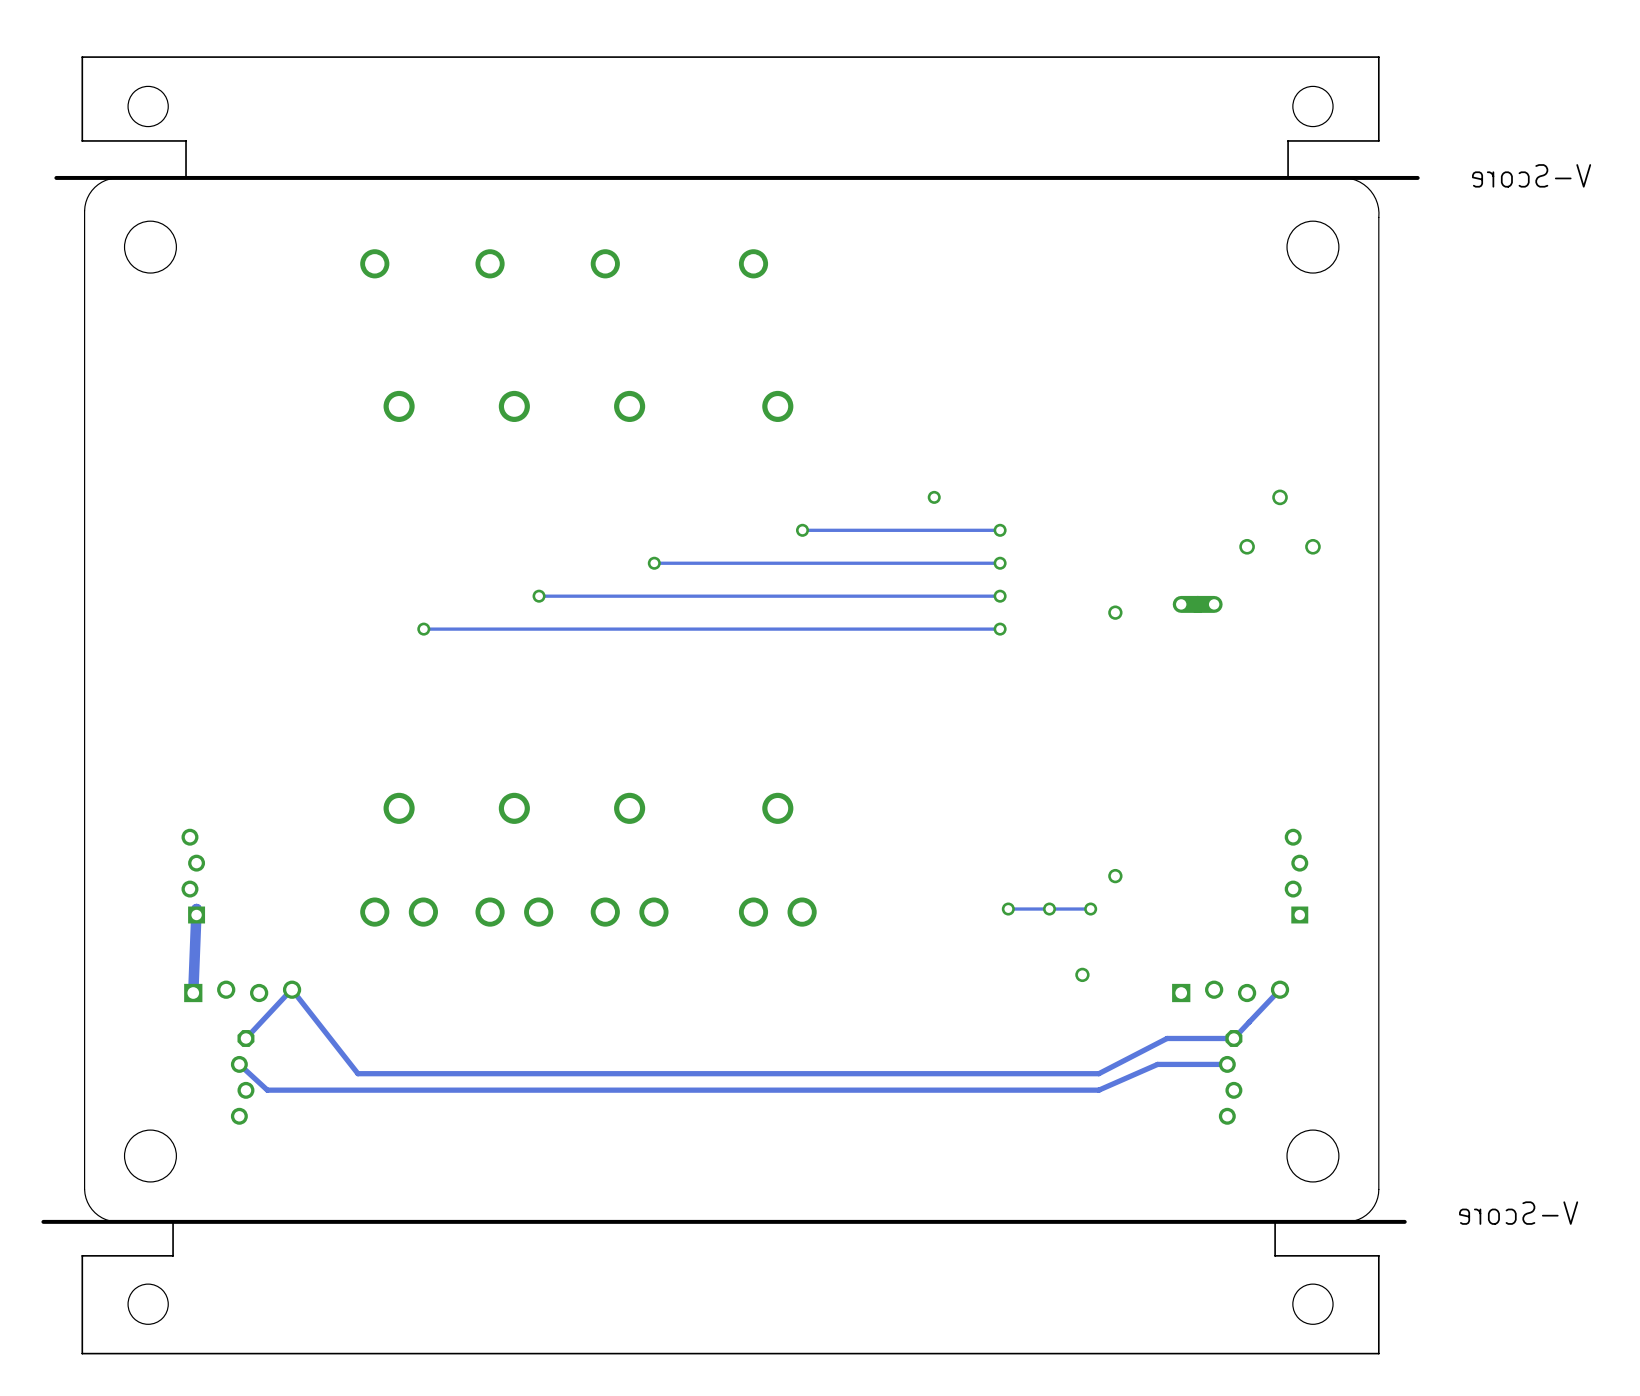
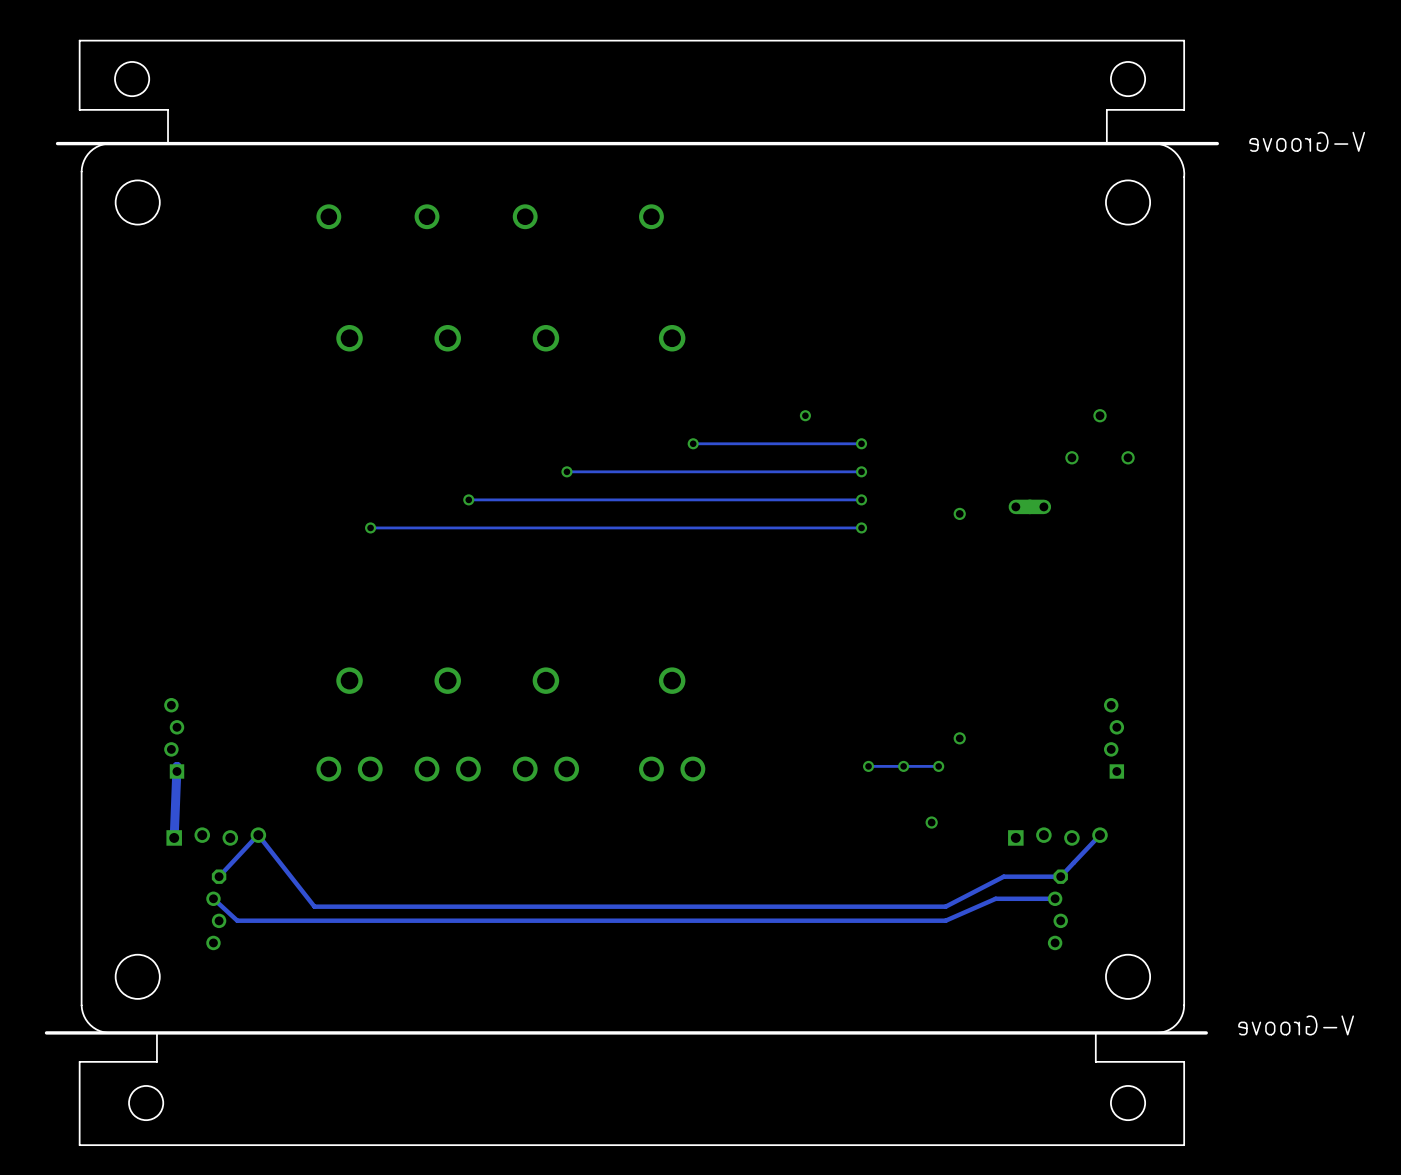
part footprint: [41, 56, 1420, 1355] -> [44, 39, 1219, 1146]

